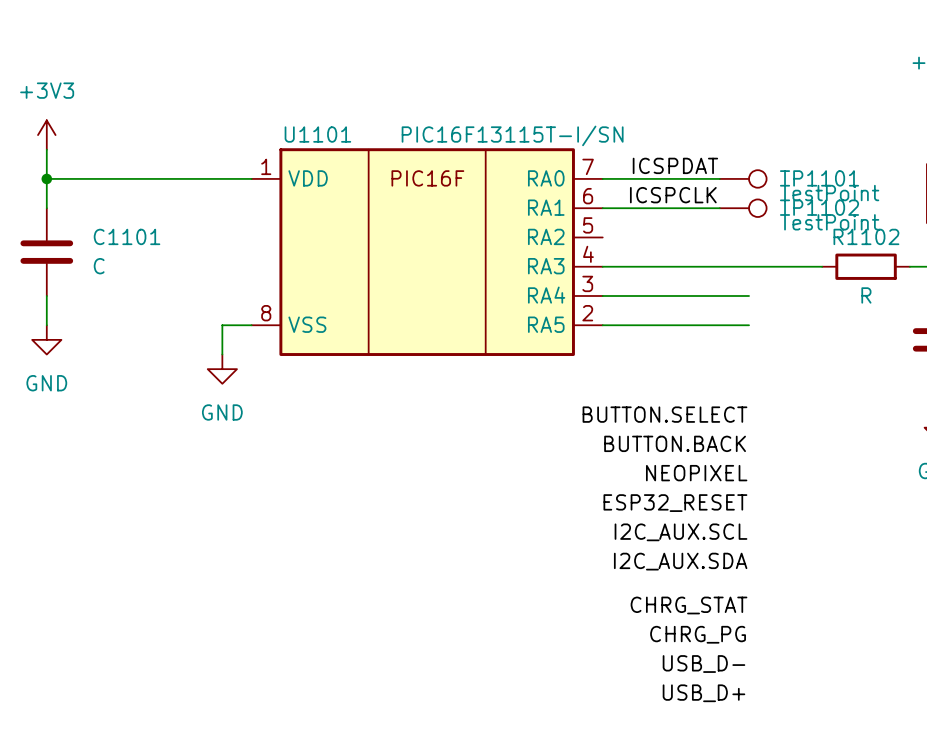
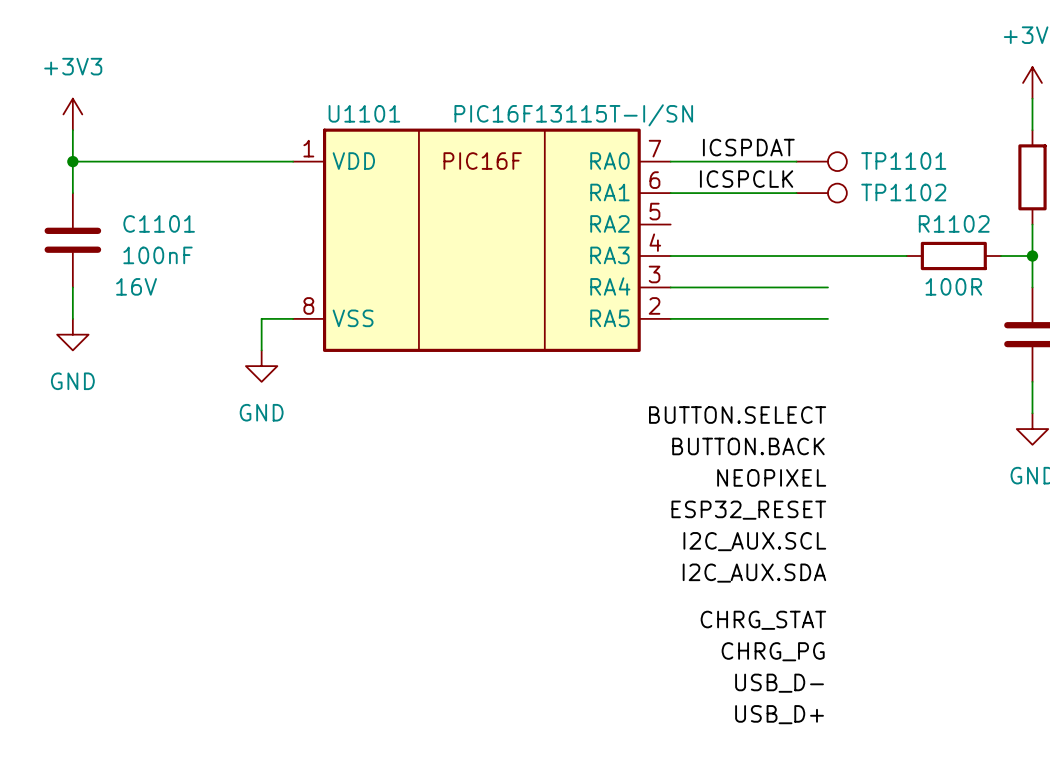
TP1101 value: TestPoint (829, 193) -> none
TP1102 value: TestPoint (829, 222) -> none
C1101 value: C (99, 266) -> 100nF (158, 255)
C1101 text: none -> 16V (136, 286)
R1102 value: R (866, 295) -> 100R (953, 286)

